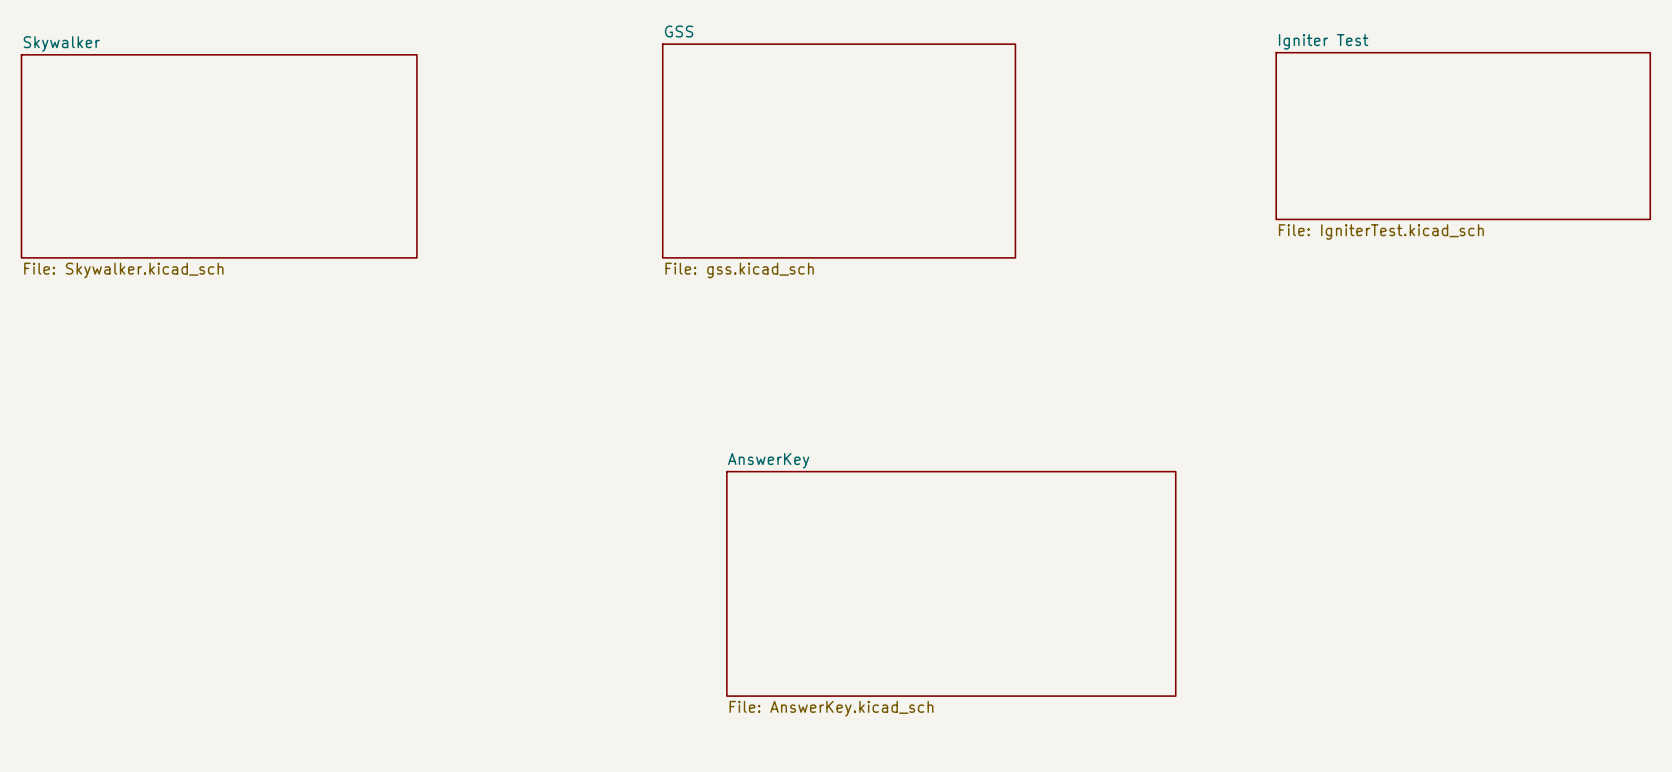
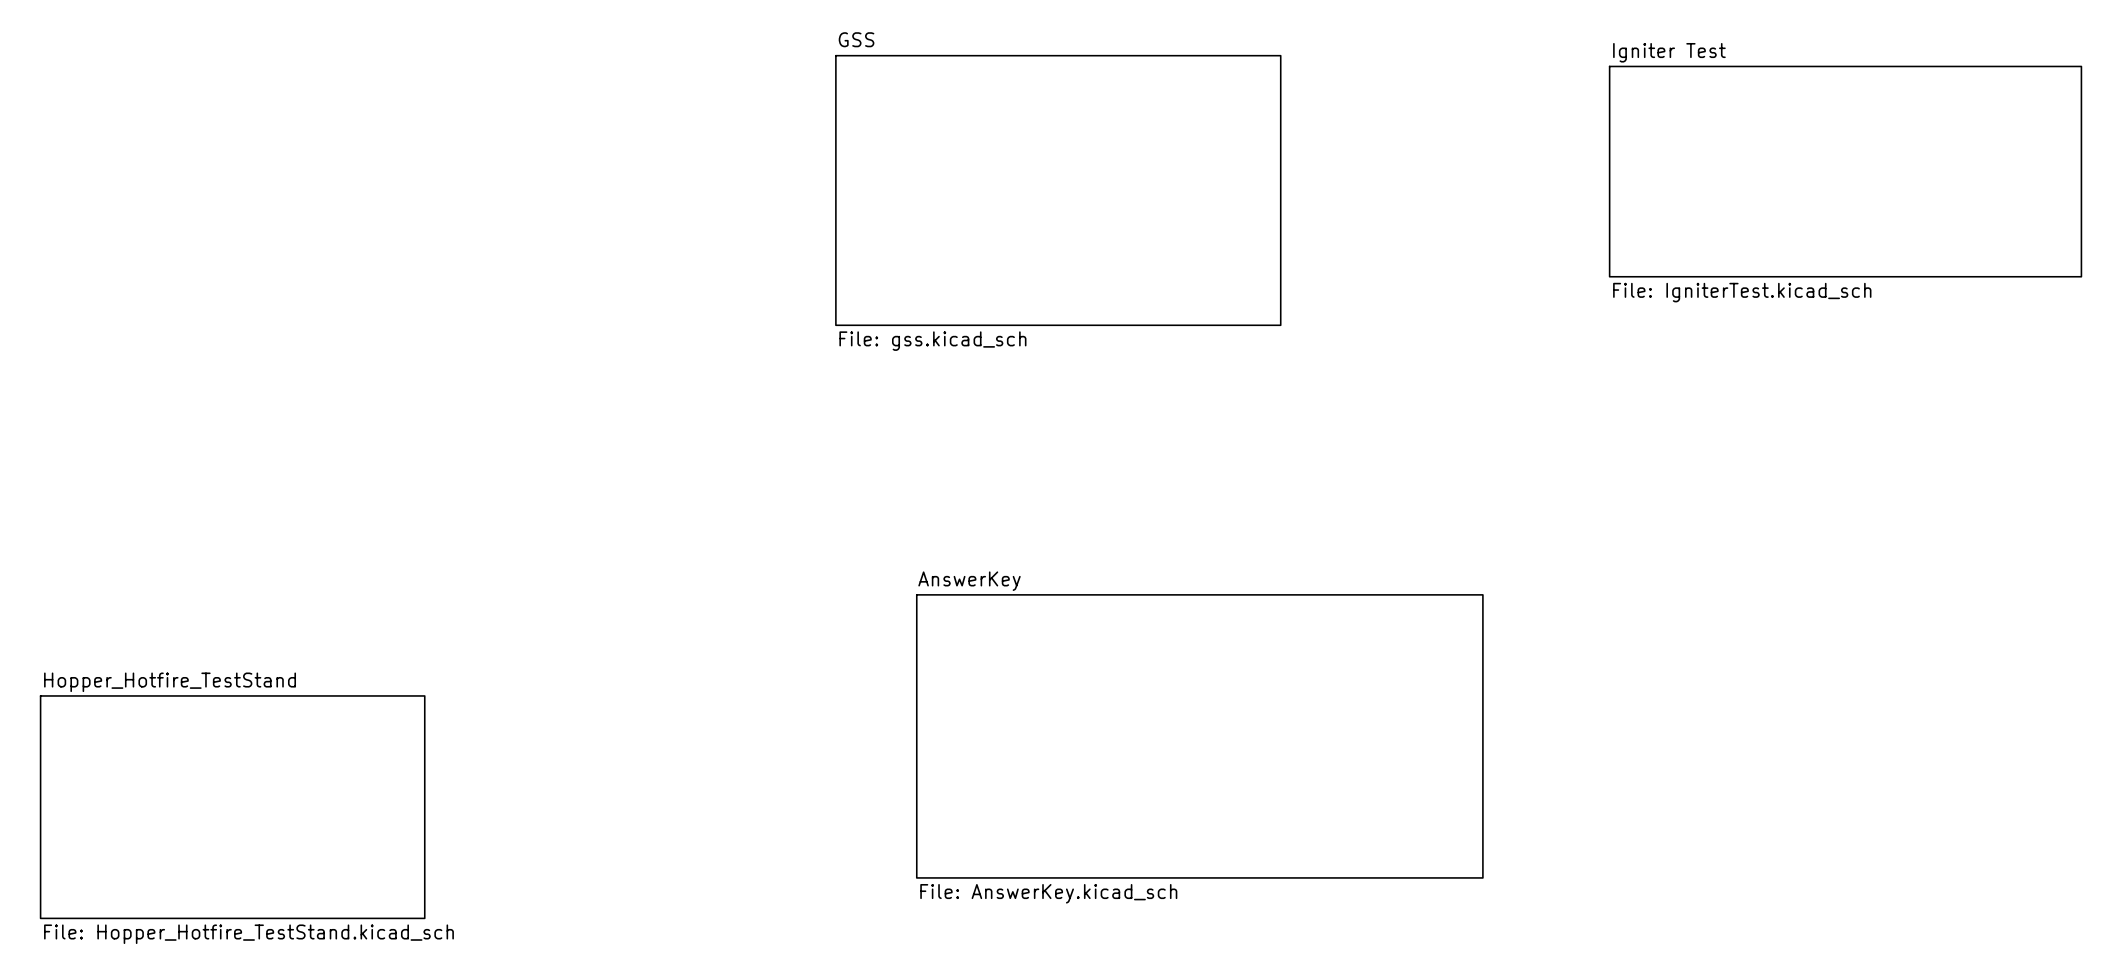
sheet Skywalker: File: Skywalker.kicad_sch (219, 156) -> none
sheet Hopper_Hotfire_TestStand: none -> File: Hopper_Hotfire_TestStand.kicad_sch (232, 807)

